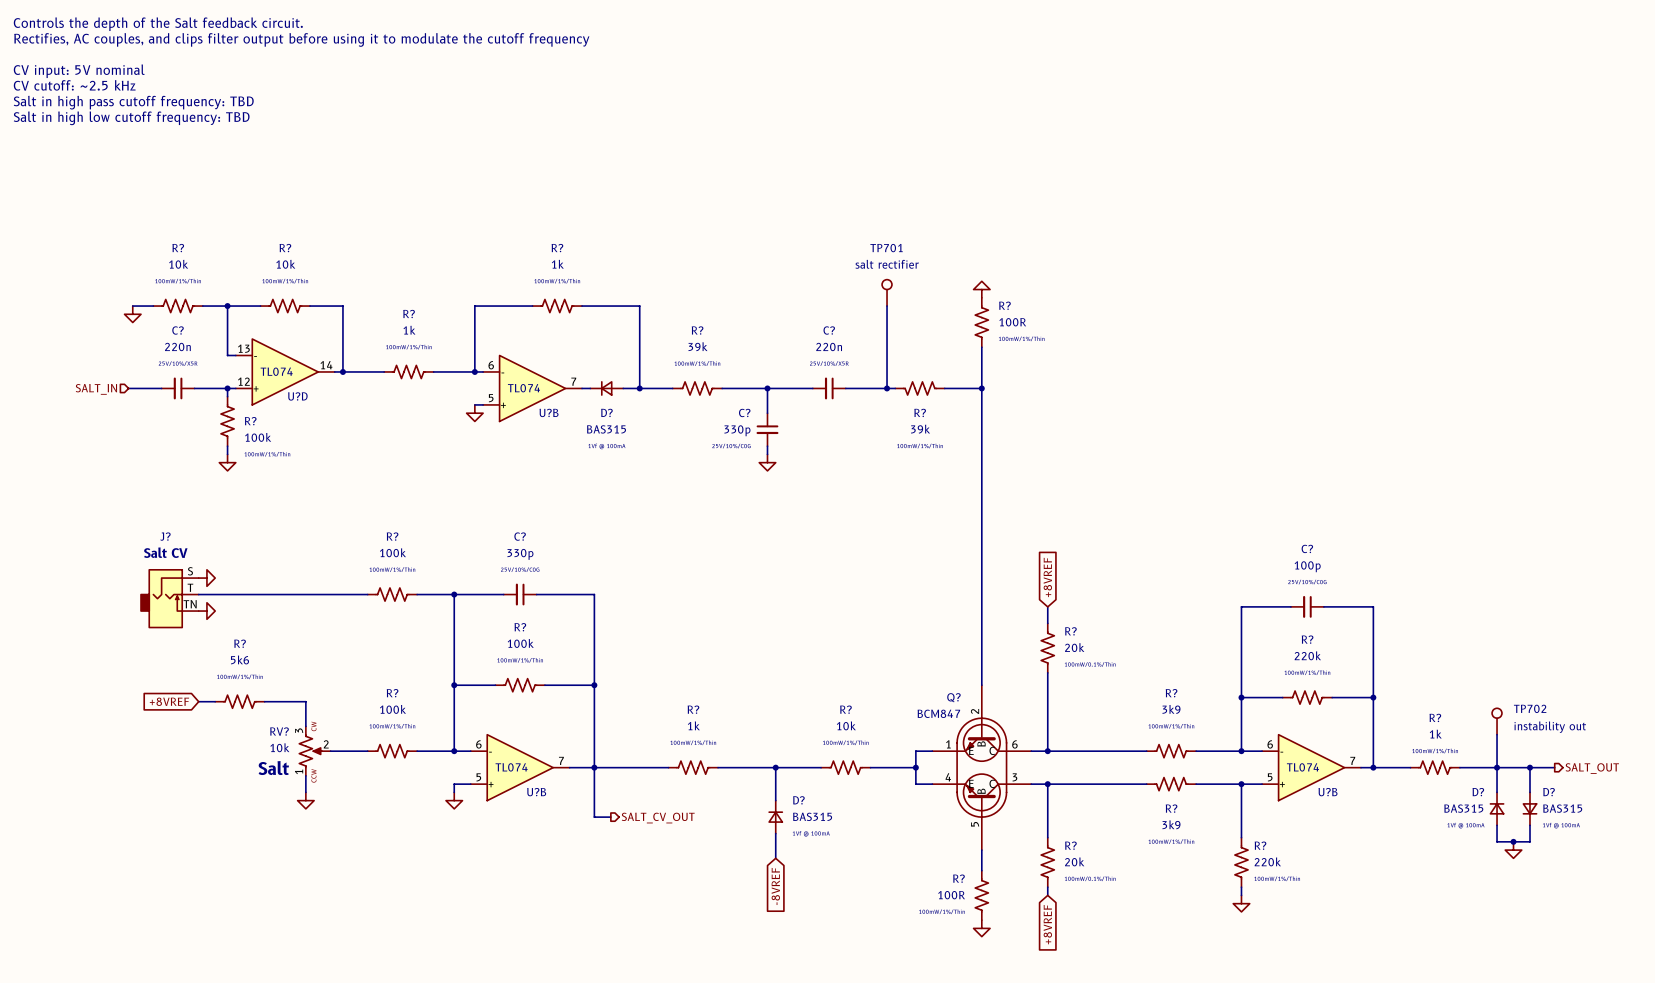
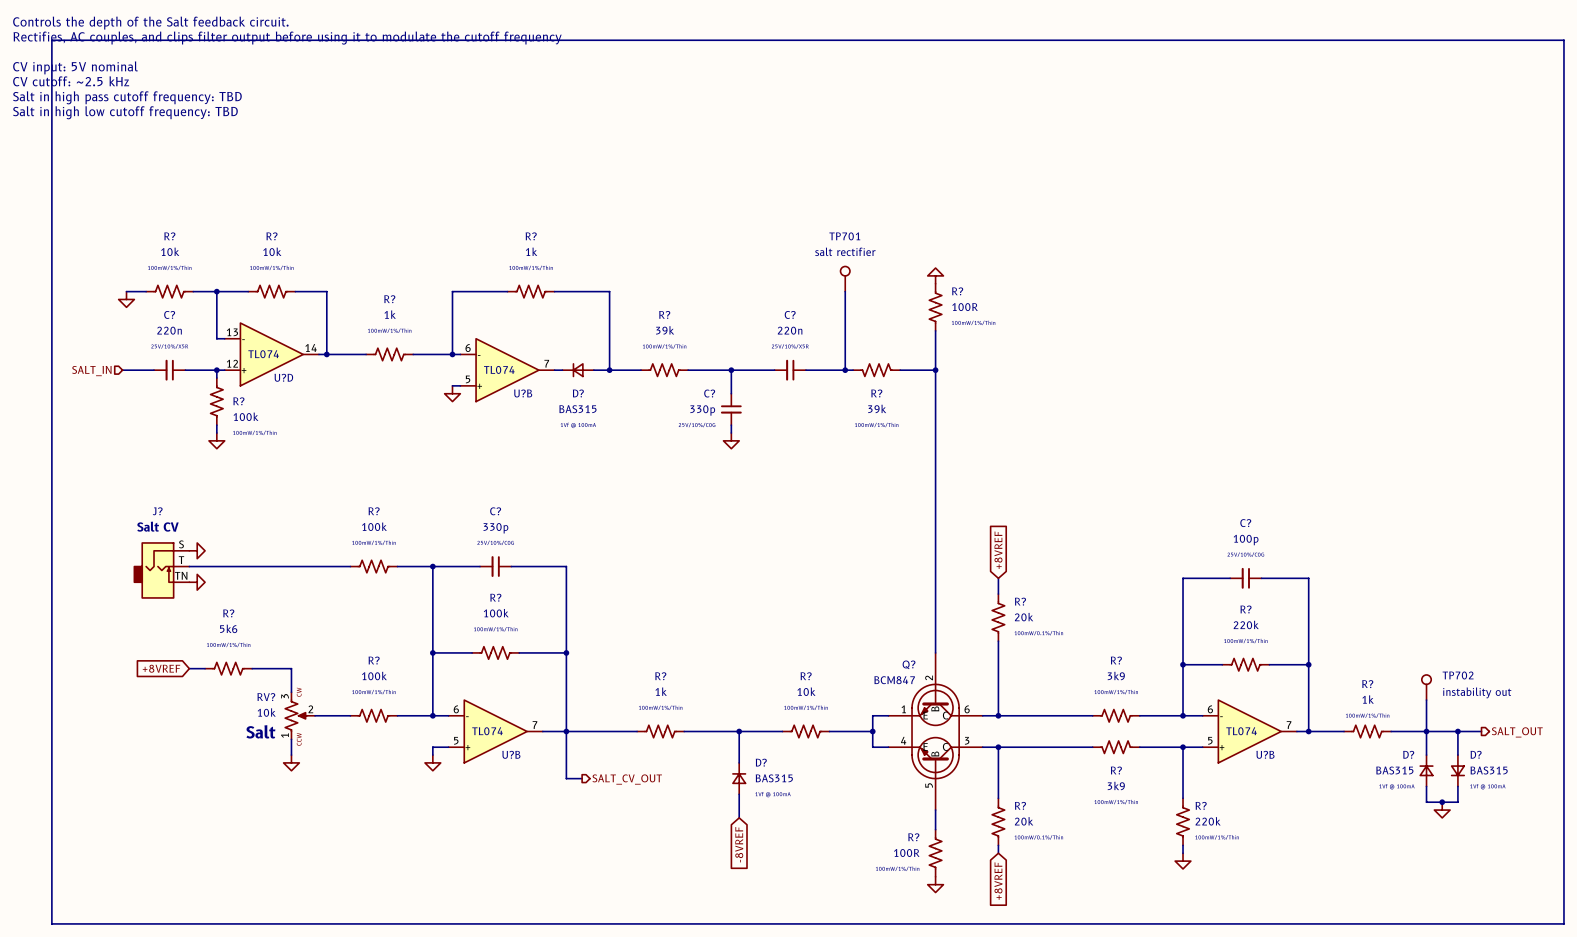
line: none -> (51, 40) (1563, 40) (1563, 923) (51, 923) (51, 40)

